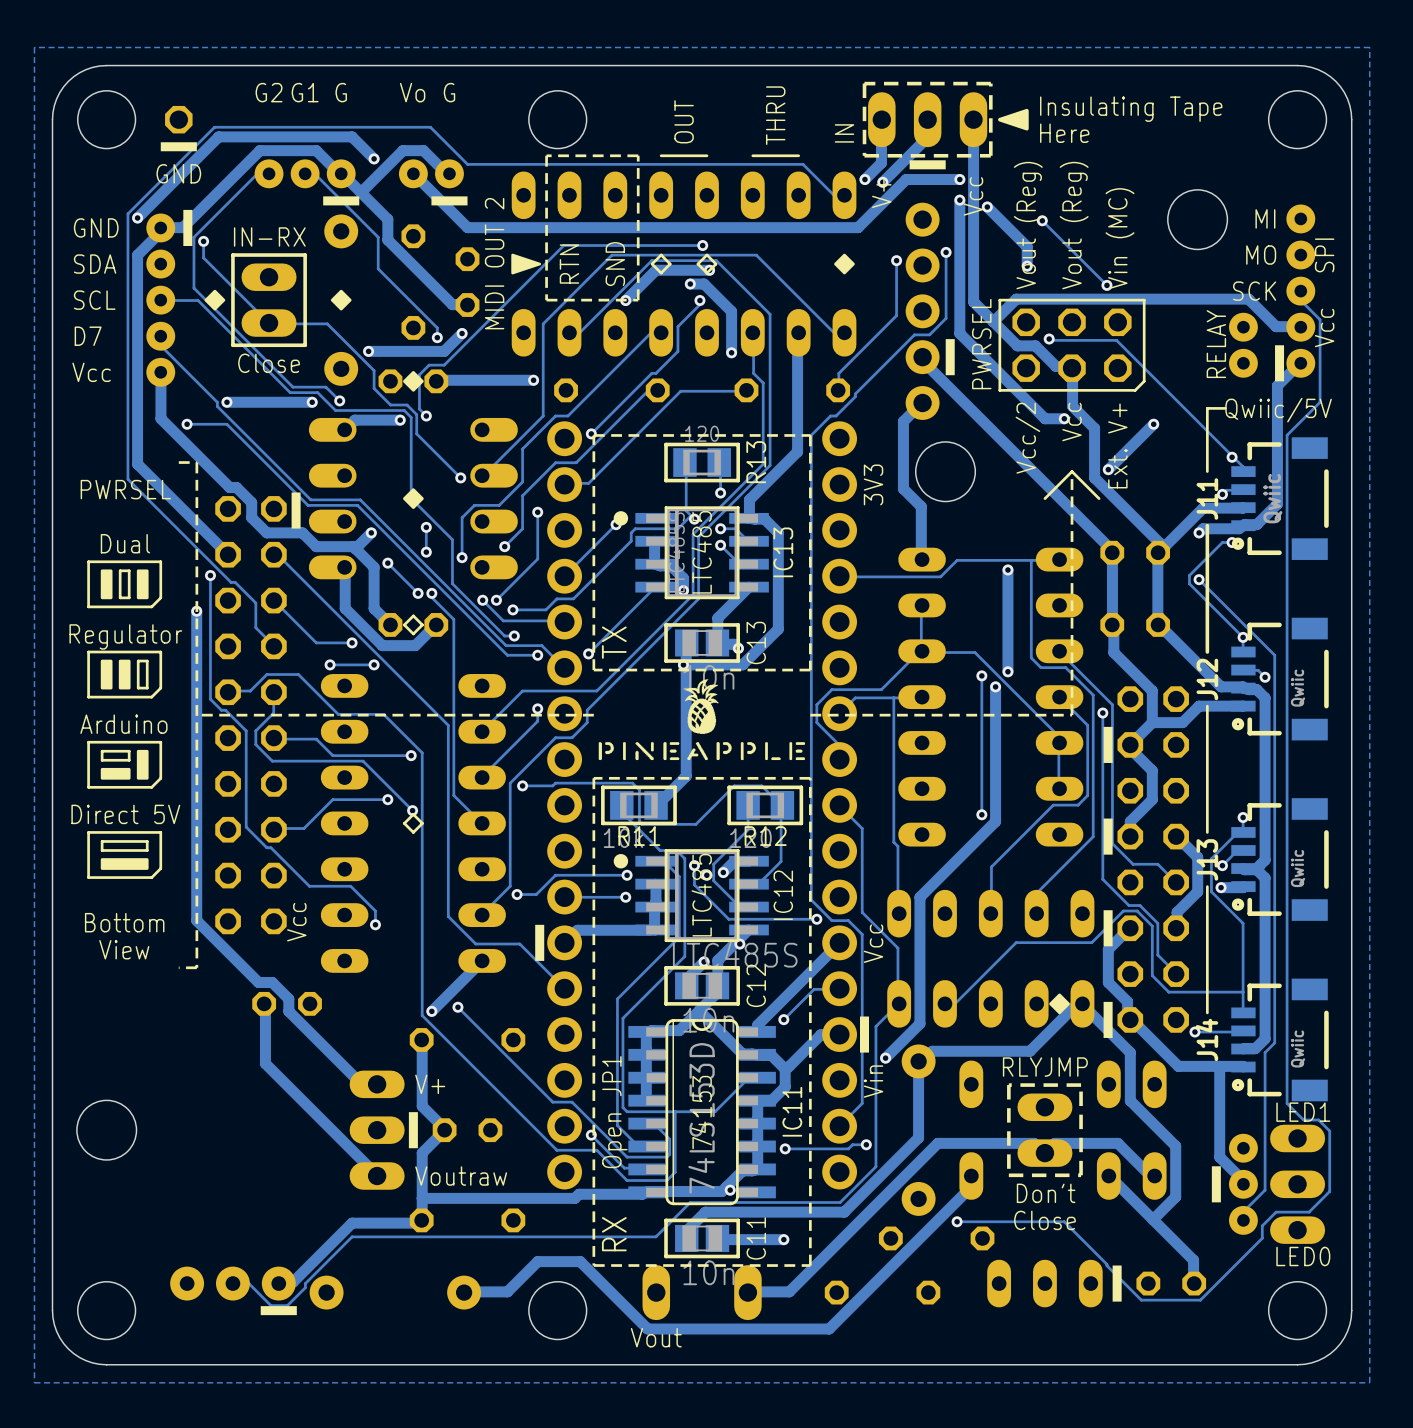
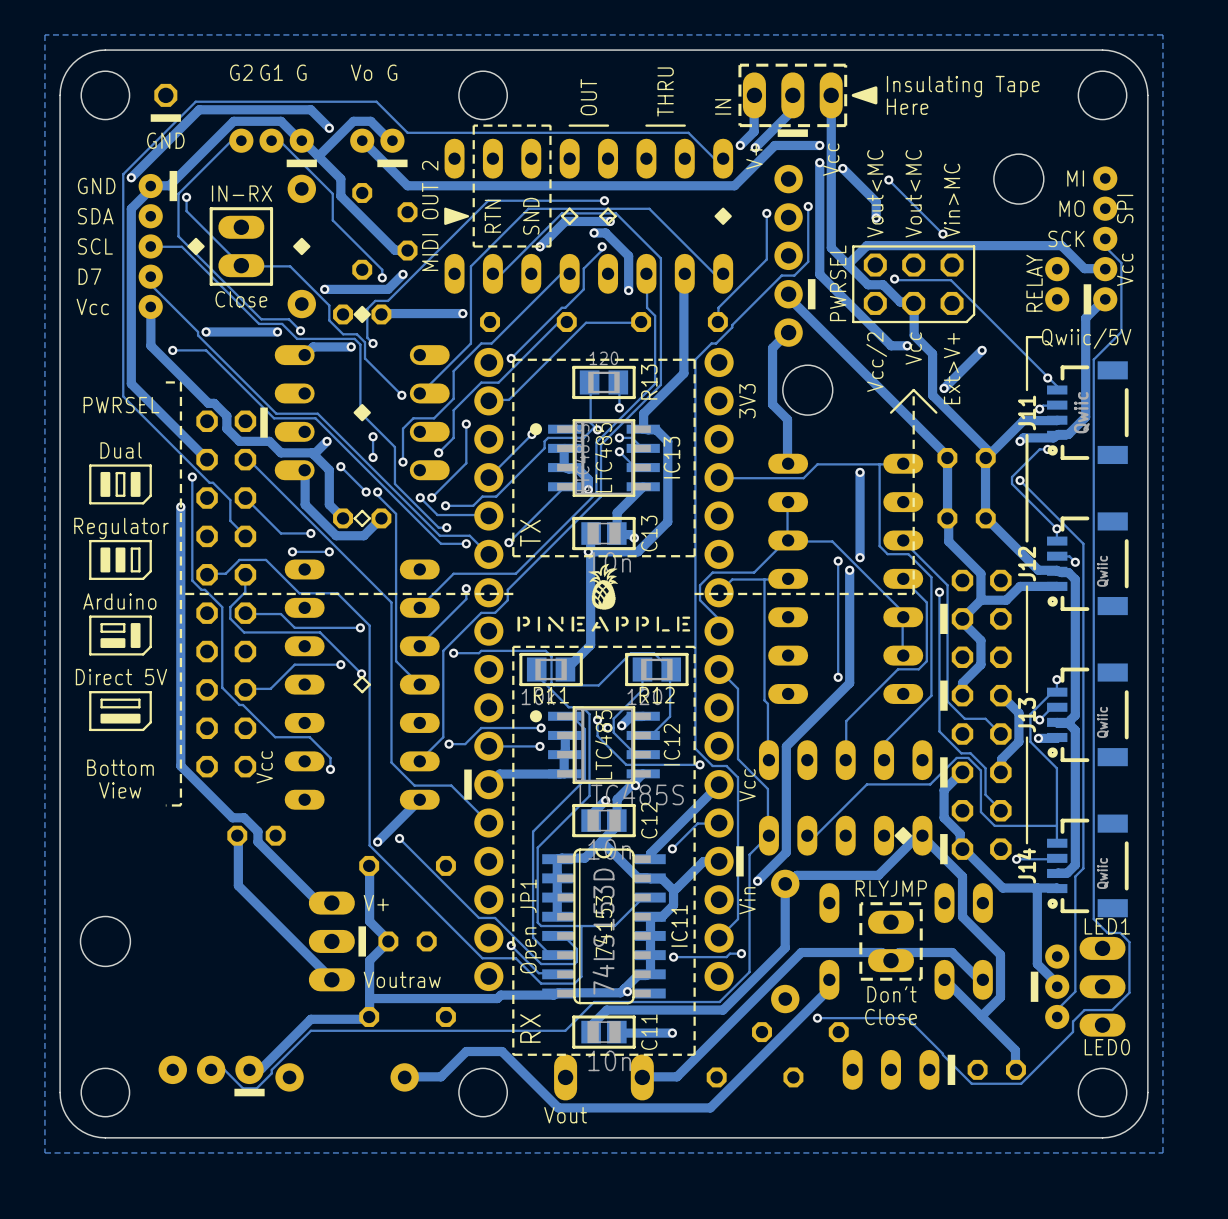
text: Vout (Reg) (1028, 225) -> Vout<MC (875, 193)
text: Vout (Reg) (1074, 225) -> Vout<MC (913, 193)
text: Vin (MC) (1120, 238) -> Vin>MC (952, 200)
text: Ext. V+ (1117, 445) -> Ext>V+ (952, 368)

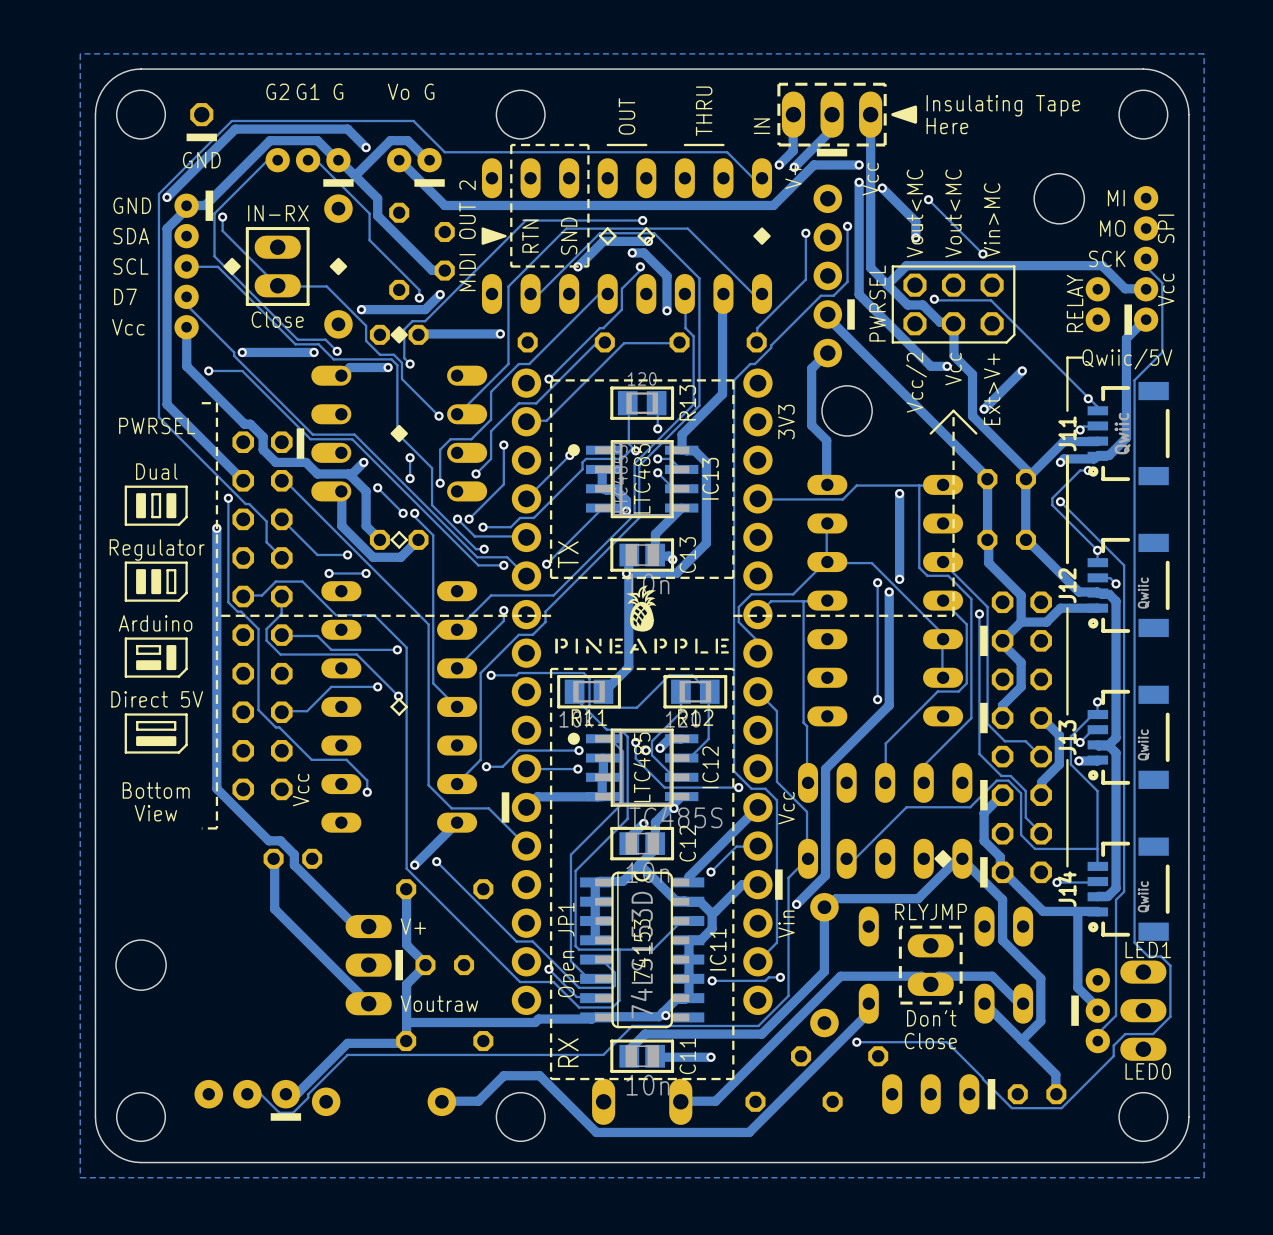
text: Vout (565, 1115) -> none

